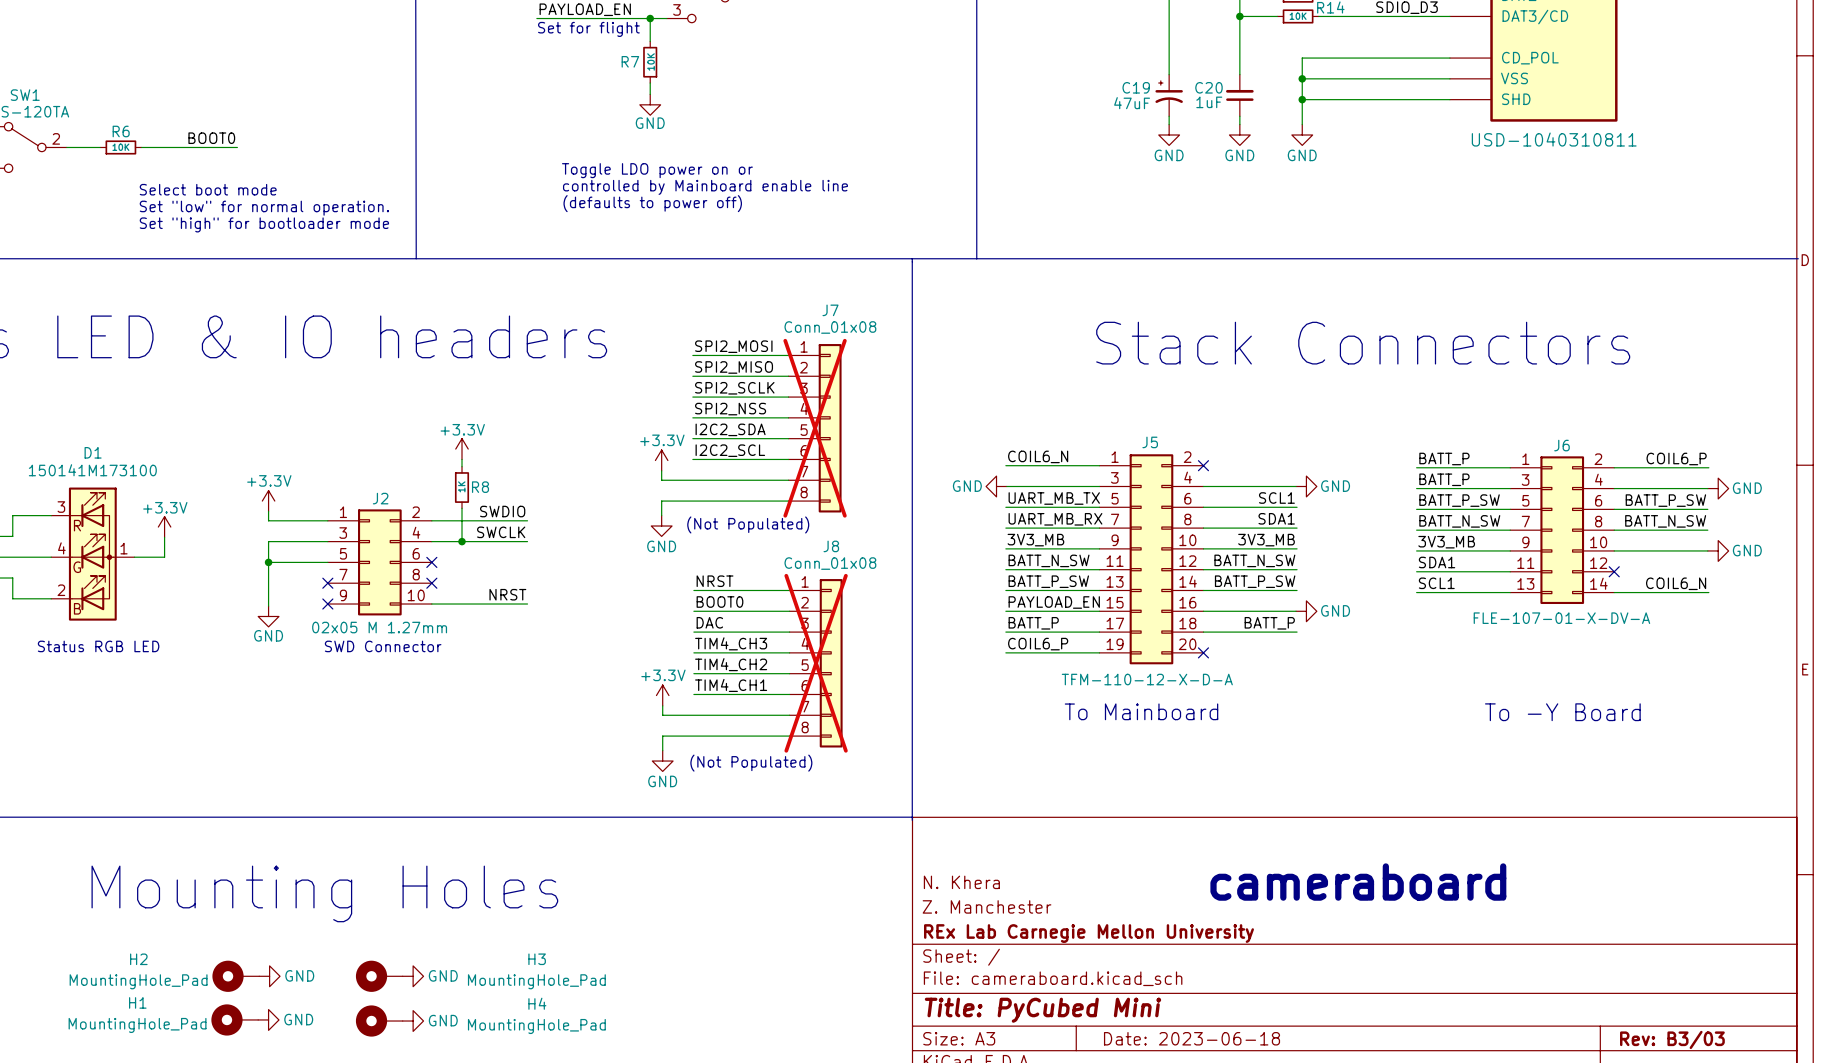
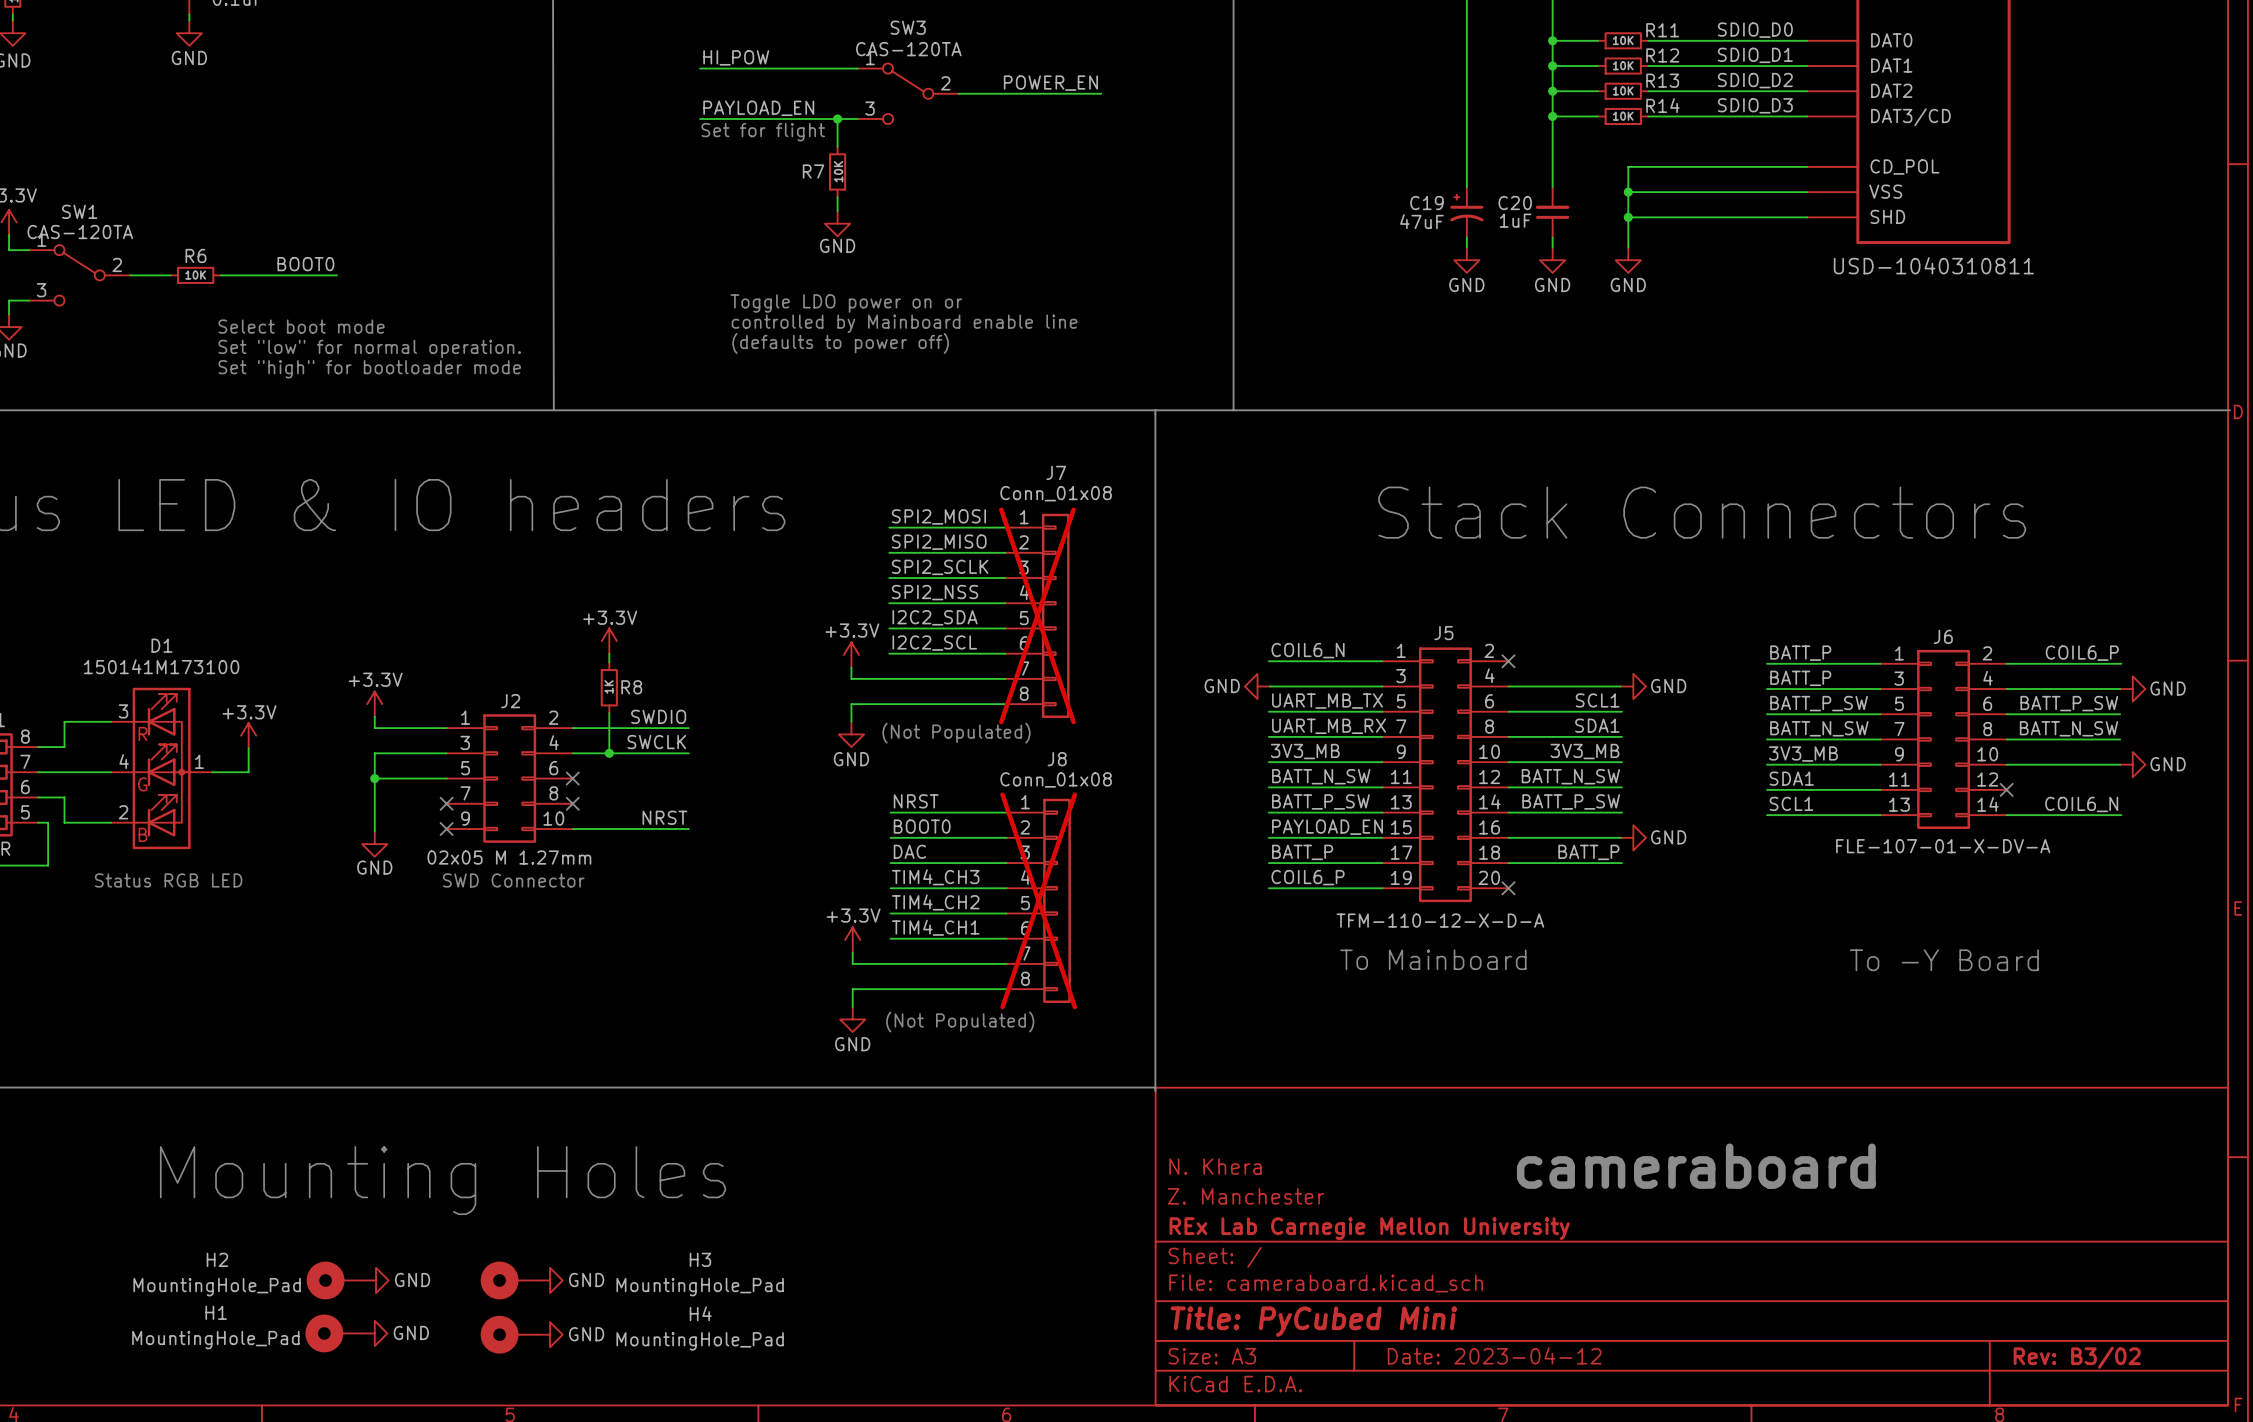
title block: Date: 2023-06-18 (1192, 1038) -> Date: 2023-04-12 (1494, 1355)
title block: Rev: B3/03 (1672, 1039) -> Rev: B3/02 (2077, 1357)

